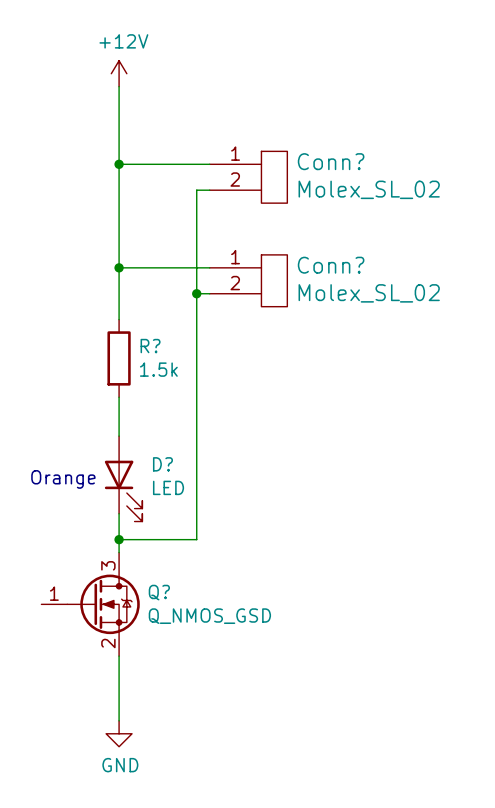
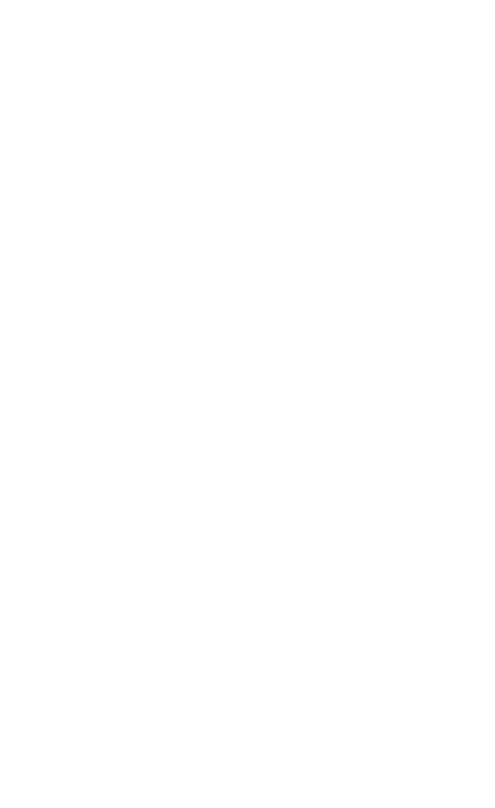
power symbol: +12V (119, 73) -> none
wire: (119, 86) (119, 319) -> none
wire: (119, 164) (209, 164) -> none
junction: (119, 164) -> none
Conn?: Molex_SL_02 (248, 177) -> none
wire: (209, 190) (196, 190) (196, 539) (119, 539) -> none
wire: (119, 267) (209, 267) -> none
junction: (119, 267) -> none
Conn?: Molex_SL_02 (248, 280) -> none
wire: (196, 293) (209, 293) -> none
junction: (196, 293) -> none
R?: 1.5k (119, 358) -> none
wire: (119, 397) (119, 436) -> none
D?: LED (123, 478) -> none
text: Orange (63, 479) -> none
wire: (119, 513) (119, 552) -> none
junction: (119, 539) -> none
Q?: Q_NMOS_GSD (90, 604) -> none
wire: (119, 656) (119, 720) -> none
power symbol: GND (119, 733) -> none

